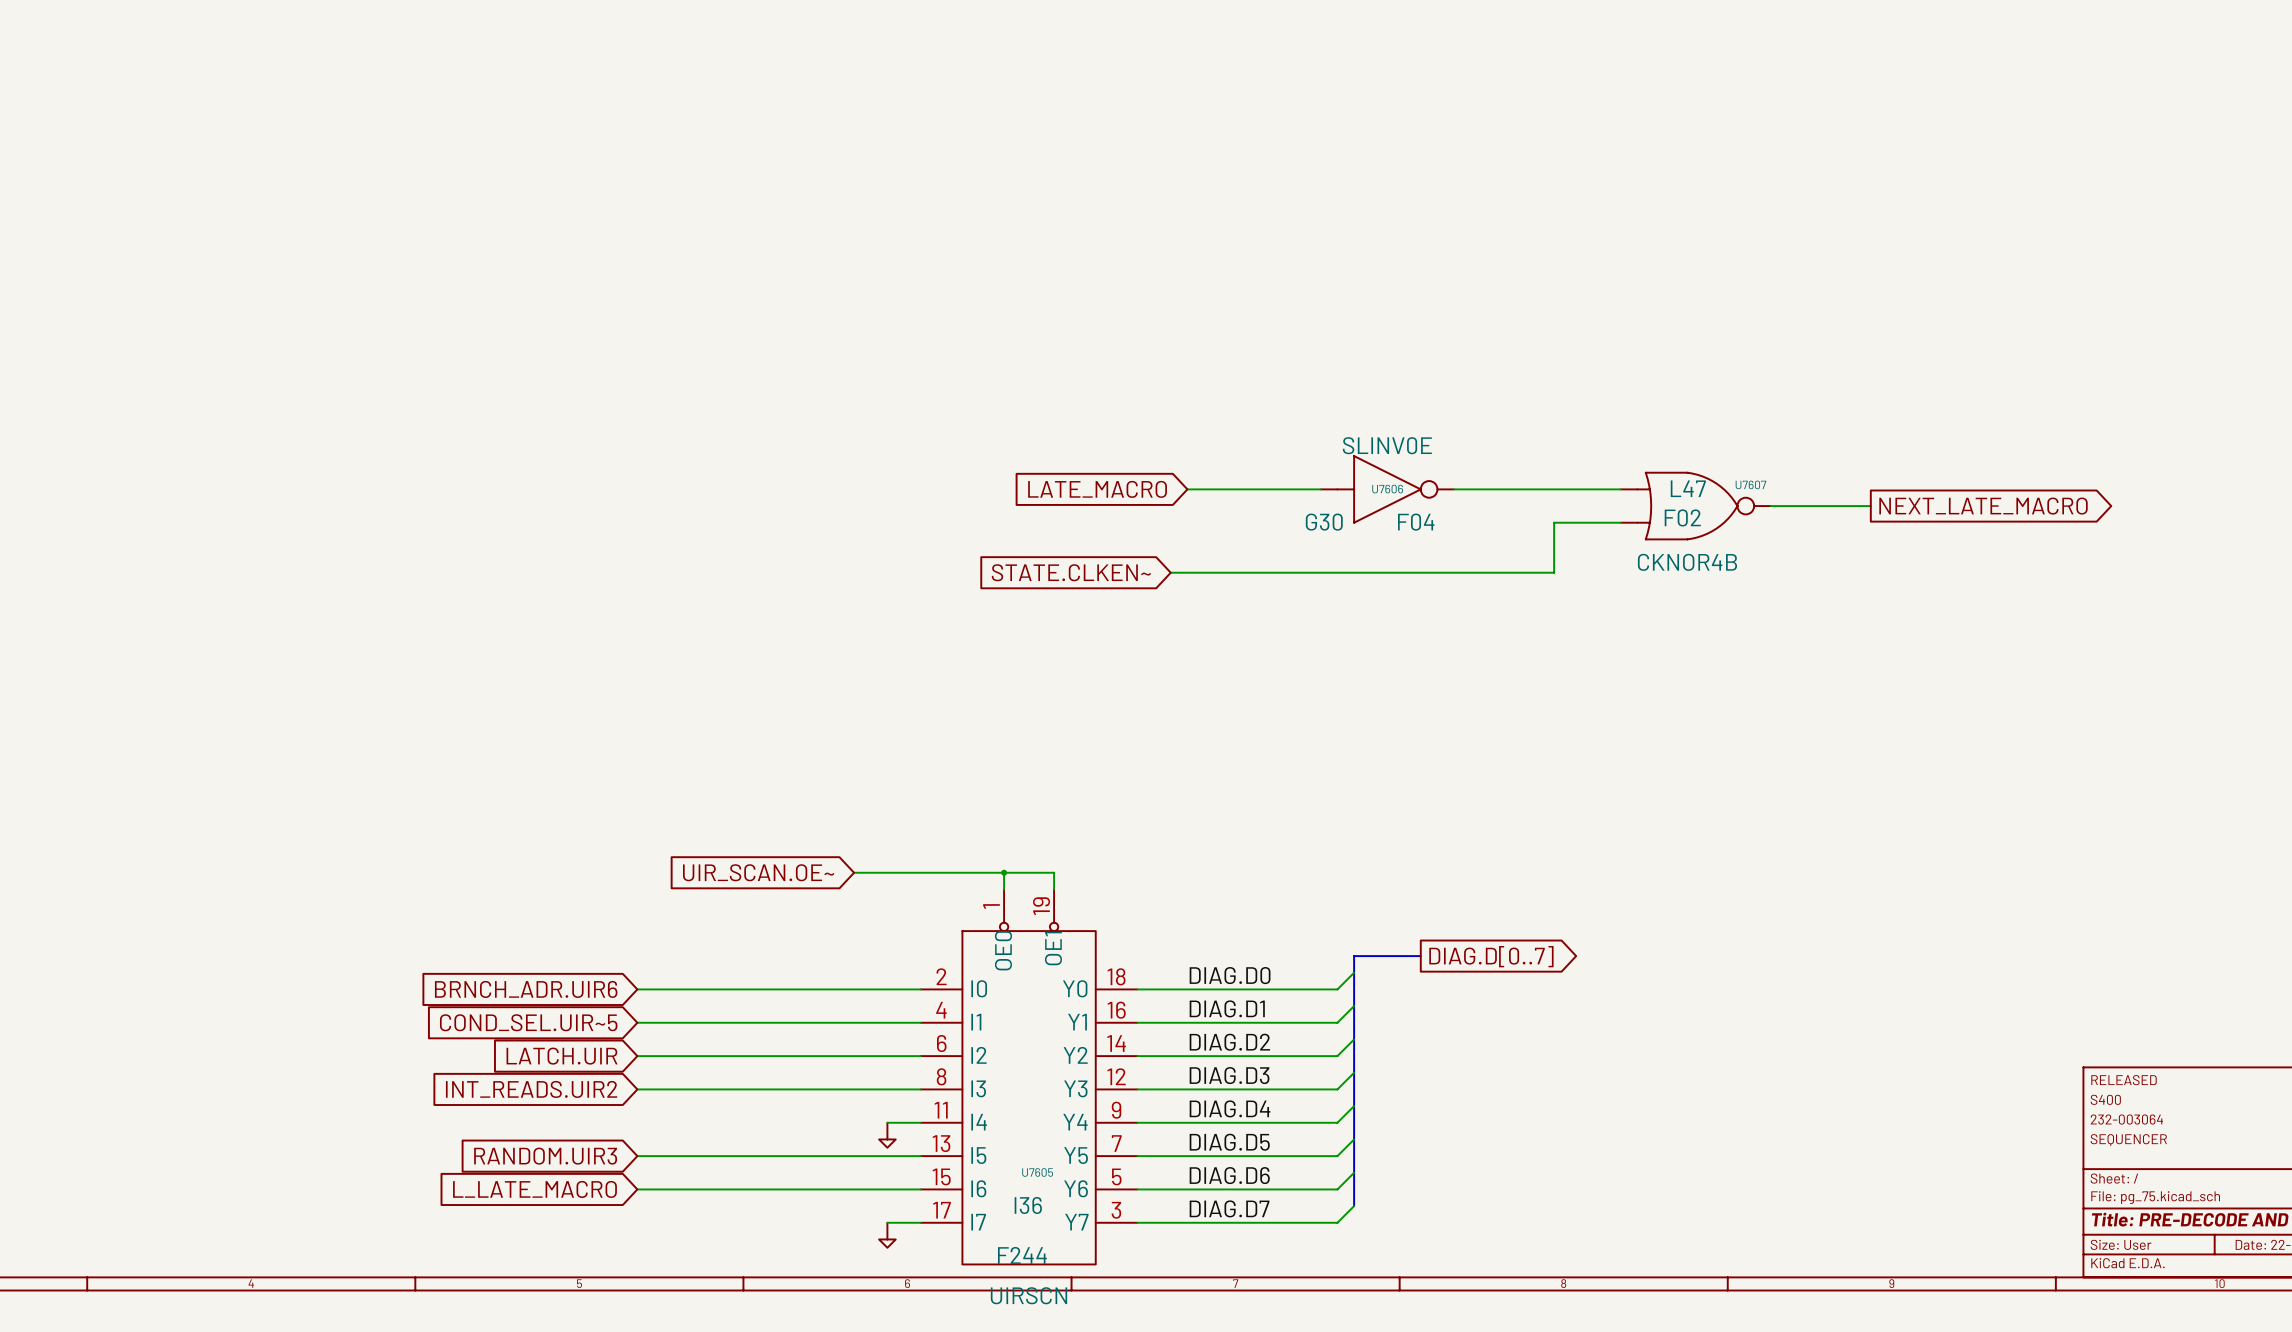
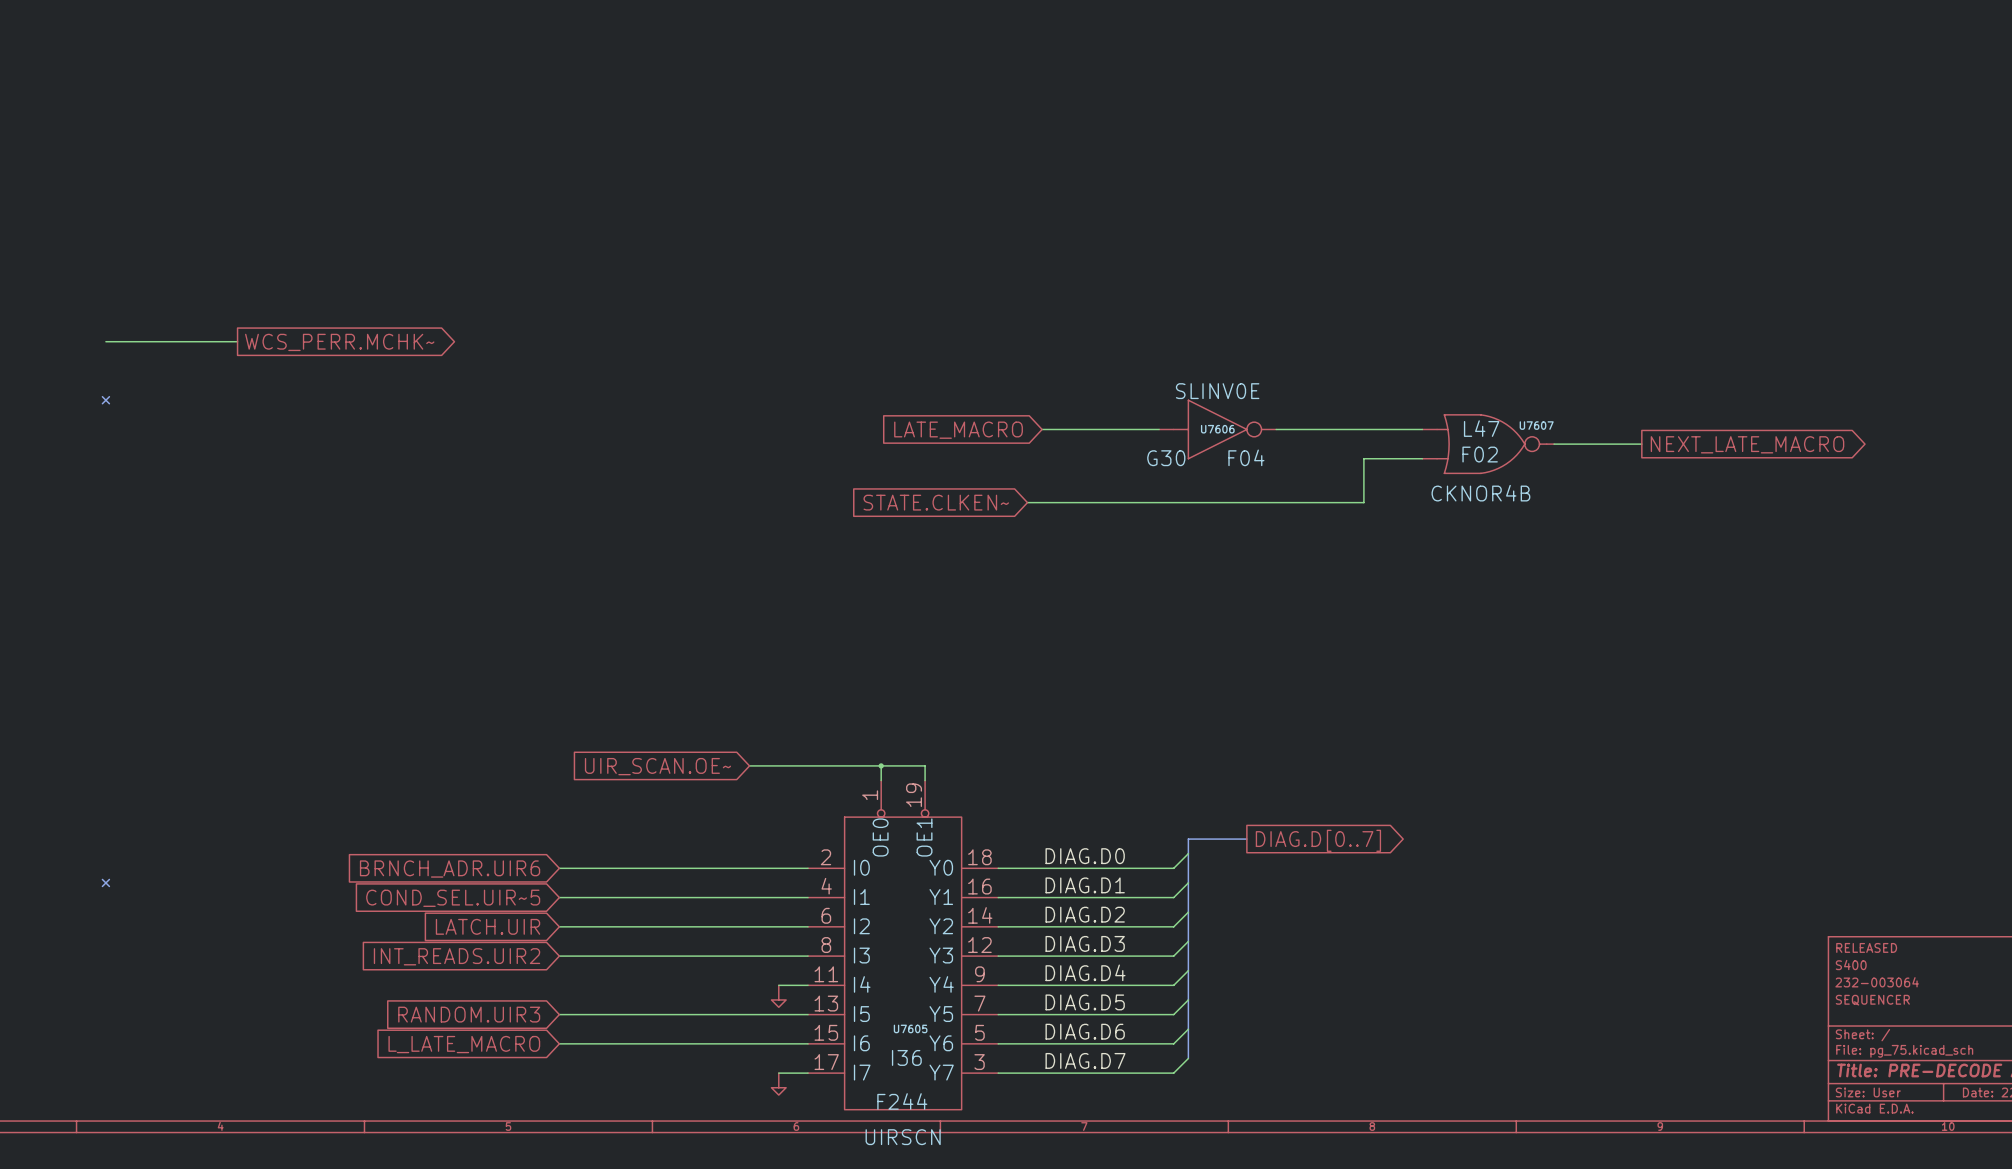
wire: none -> (105, 341) (237, 341)
global label: none -> WCS_PERR.MCHK~ (339, 342)
no-connect mark: none -> (105, 400)
no-connect mark: none -> (105, 882)

